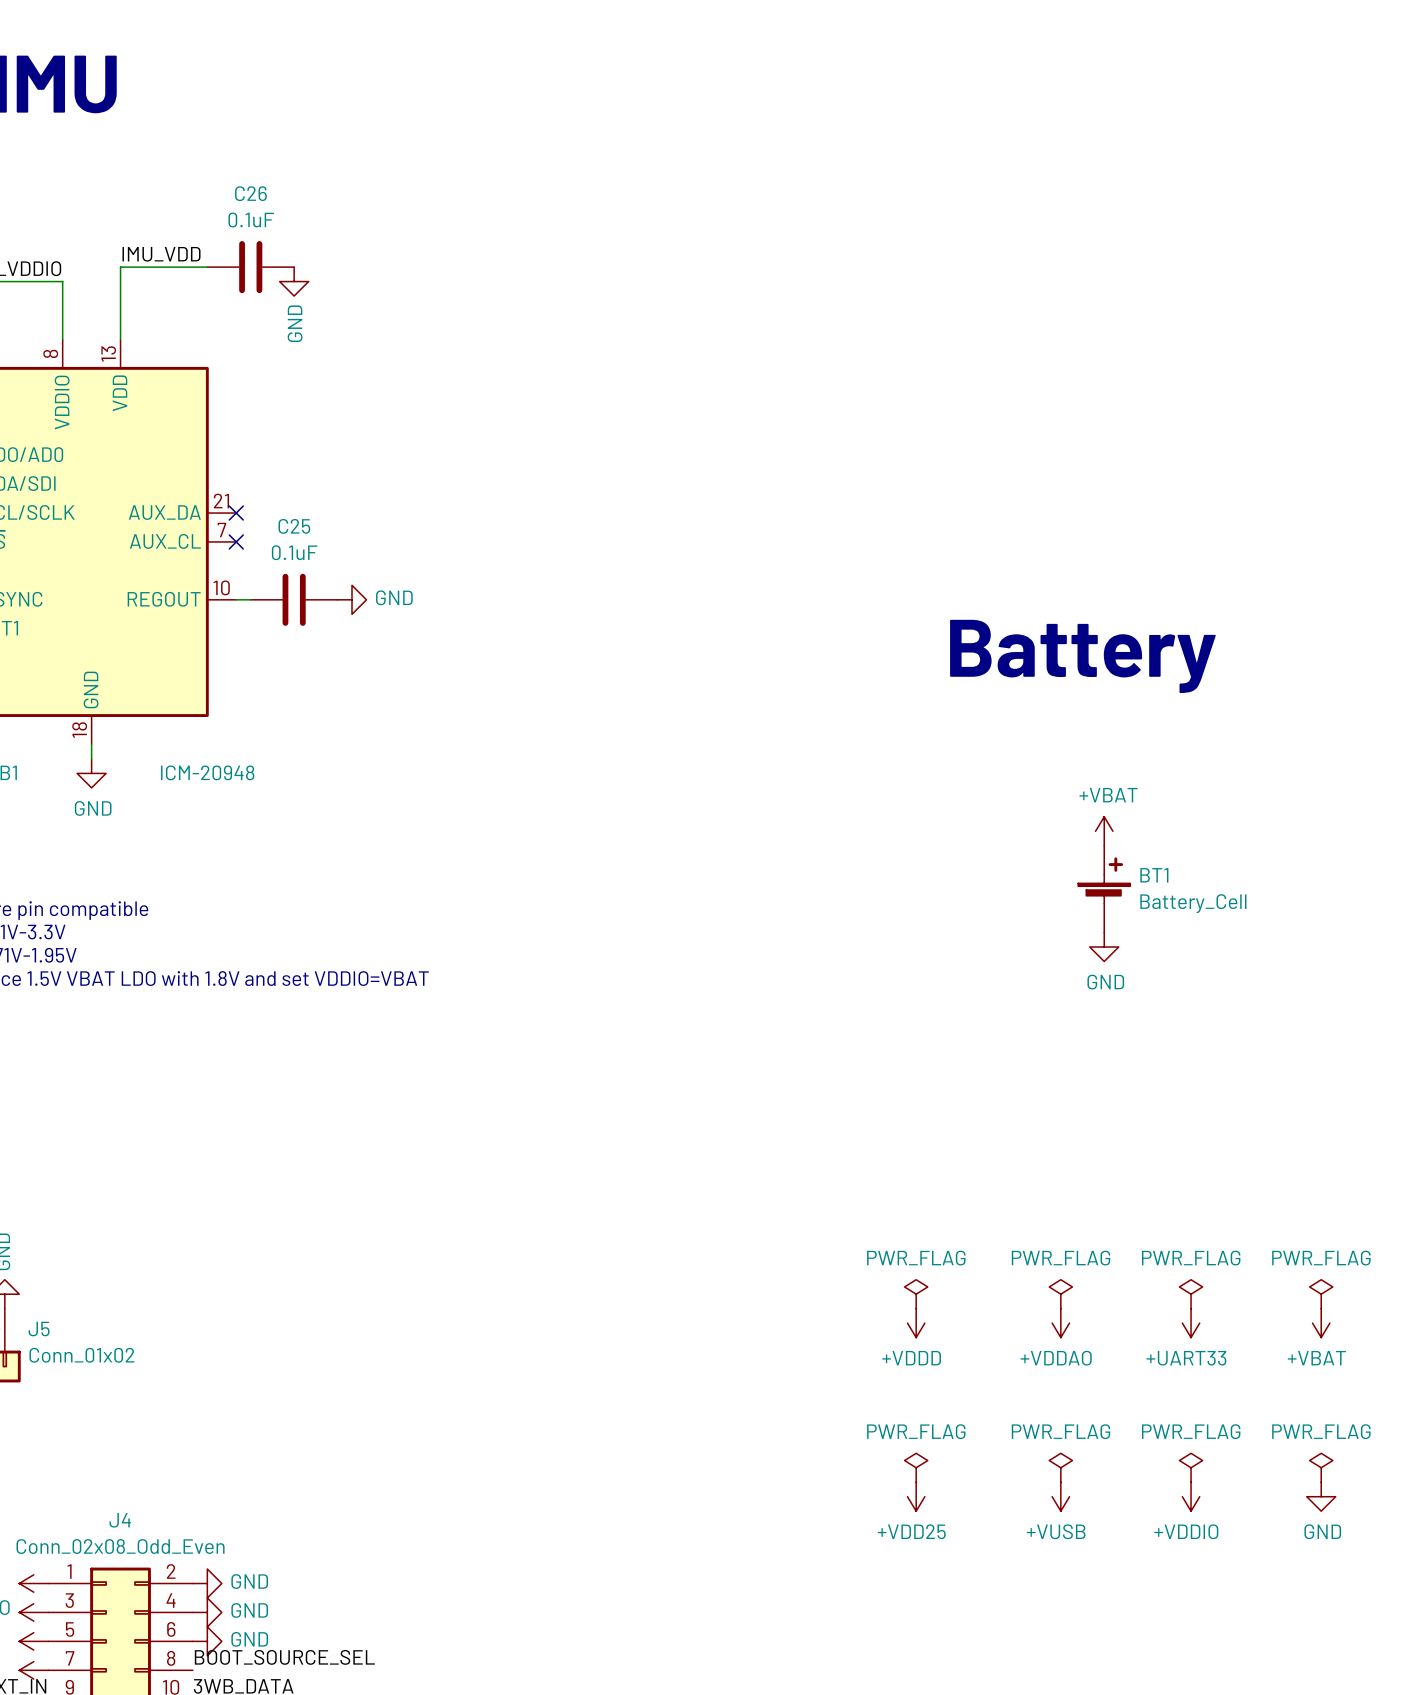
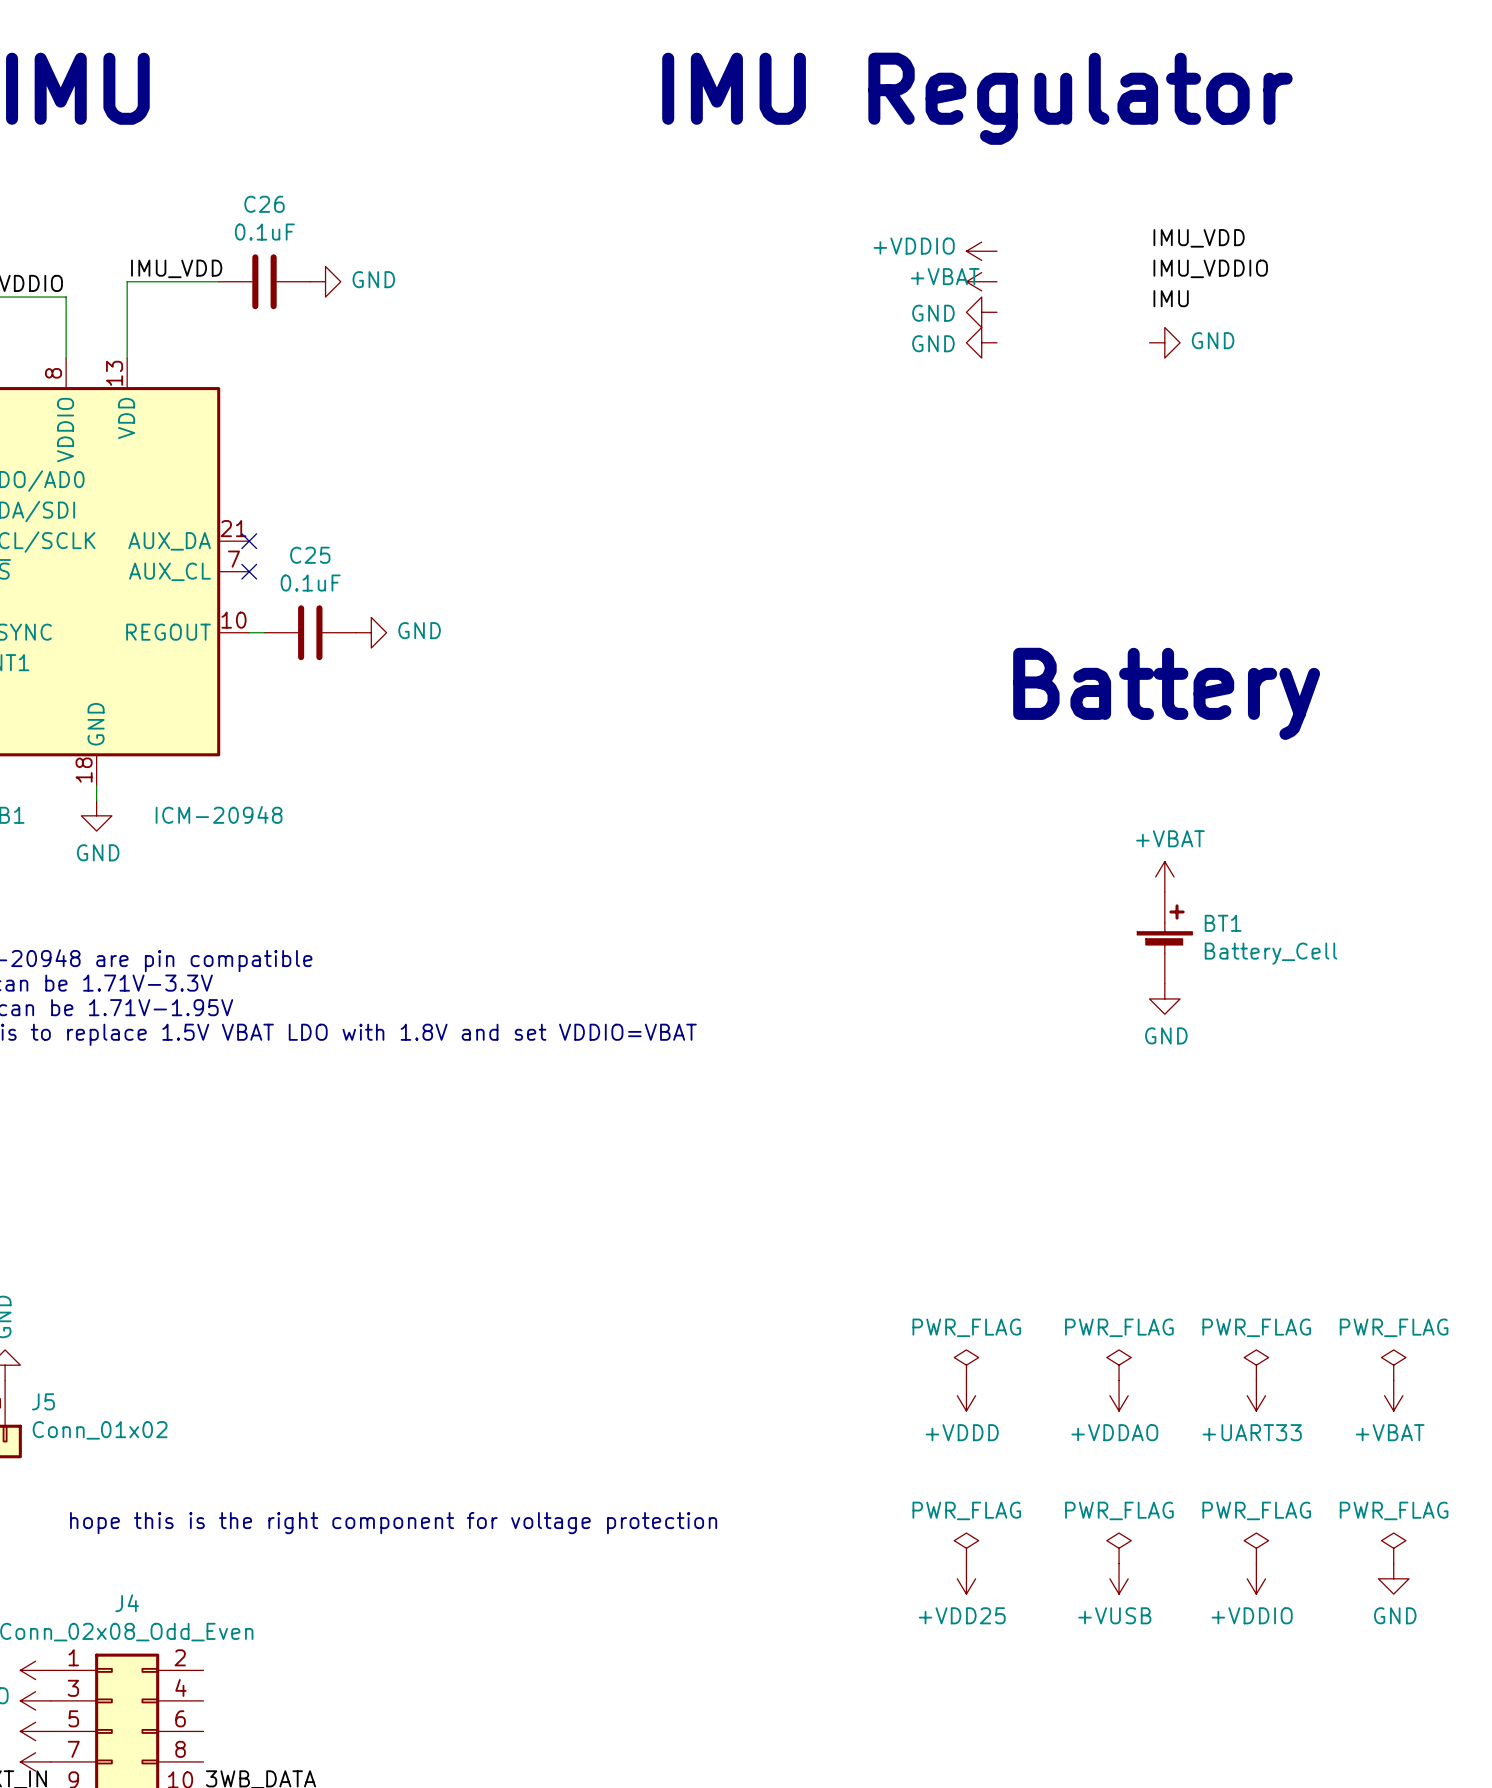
text: none -> IMU Regulator (977, 98)
label: none -> IMU_VDD (1199, 238)
power symbol: none -> +VDDIO (981, 251)
label: none -> IMU_VDDIO (1210, 268)
power symbol: none -> +VBAT (981, 281)
power symbol rotation: 0° (294, 281) -> 90° counterclockwise (325, 281)
power symbol position: GND (294, 281) -> GND (325, 281)
label: none -> IMU (1171, 298)
power symbol: none -> GND (981, 312)
power symbol: none -> GND (981, 342)
power symbol: none -> GND (1164, 342)
text: none -> hope this is the right component for voltage protection (393, 1523)
power symbol: GND (207, 1583) -> none
power symbol: GND (207, 1612) -> none
power symbol: GND (207, 1641) -> none
label: BOOT_SOURCE_SEL (284, 1657) -> none

